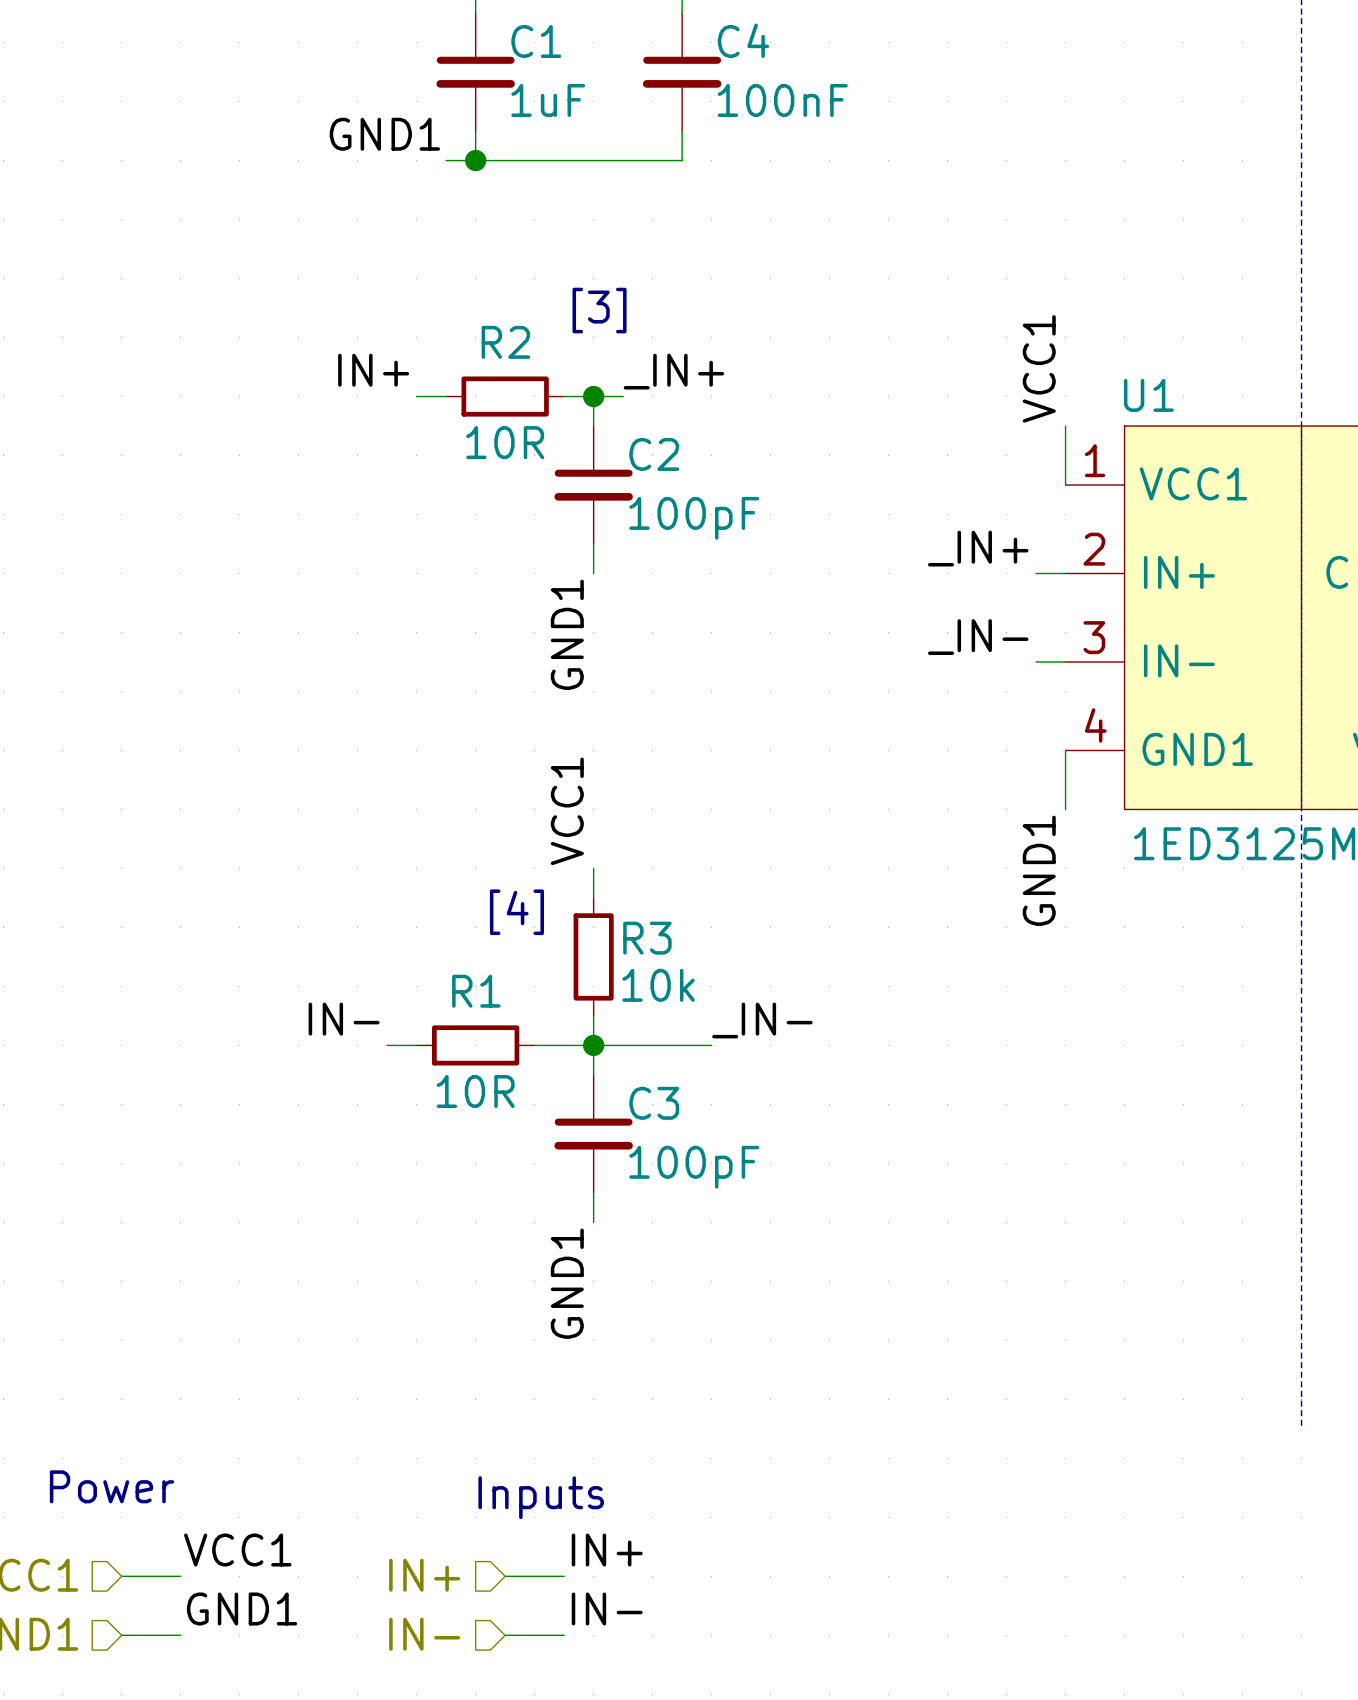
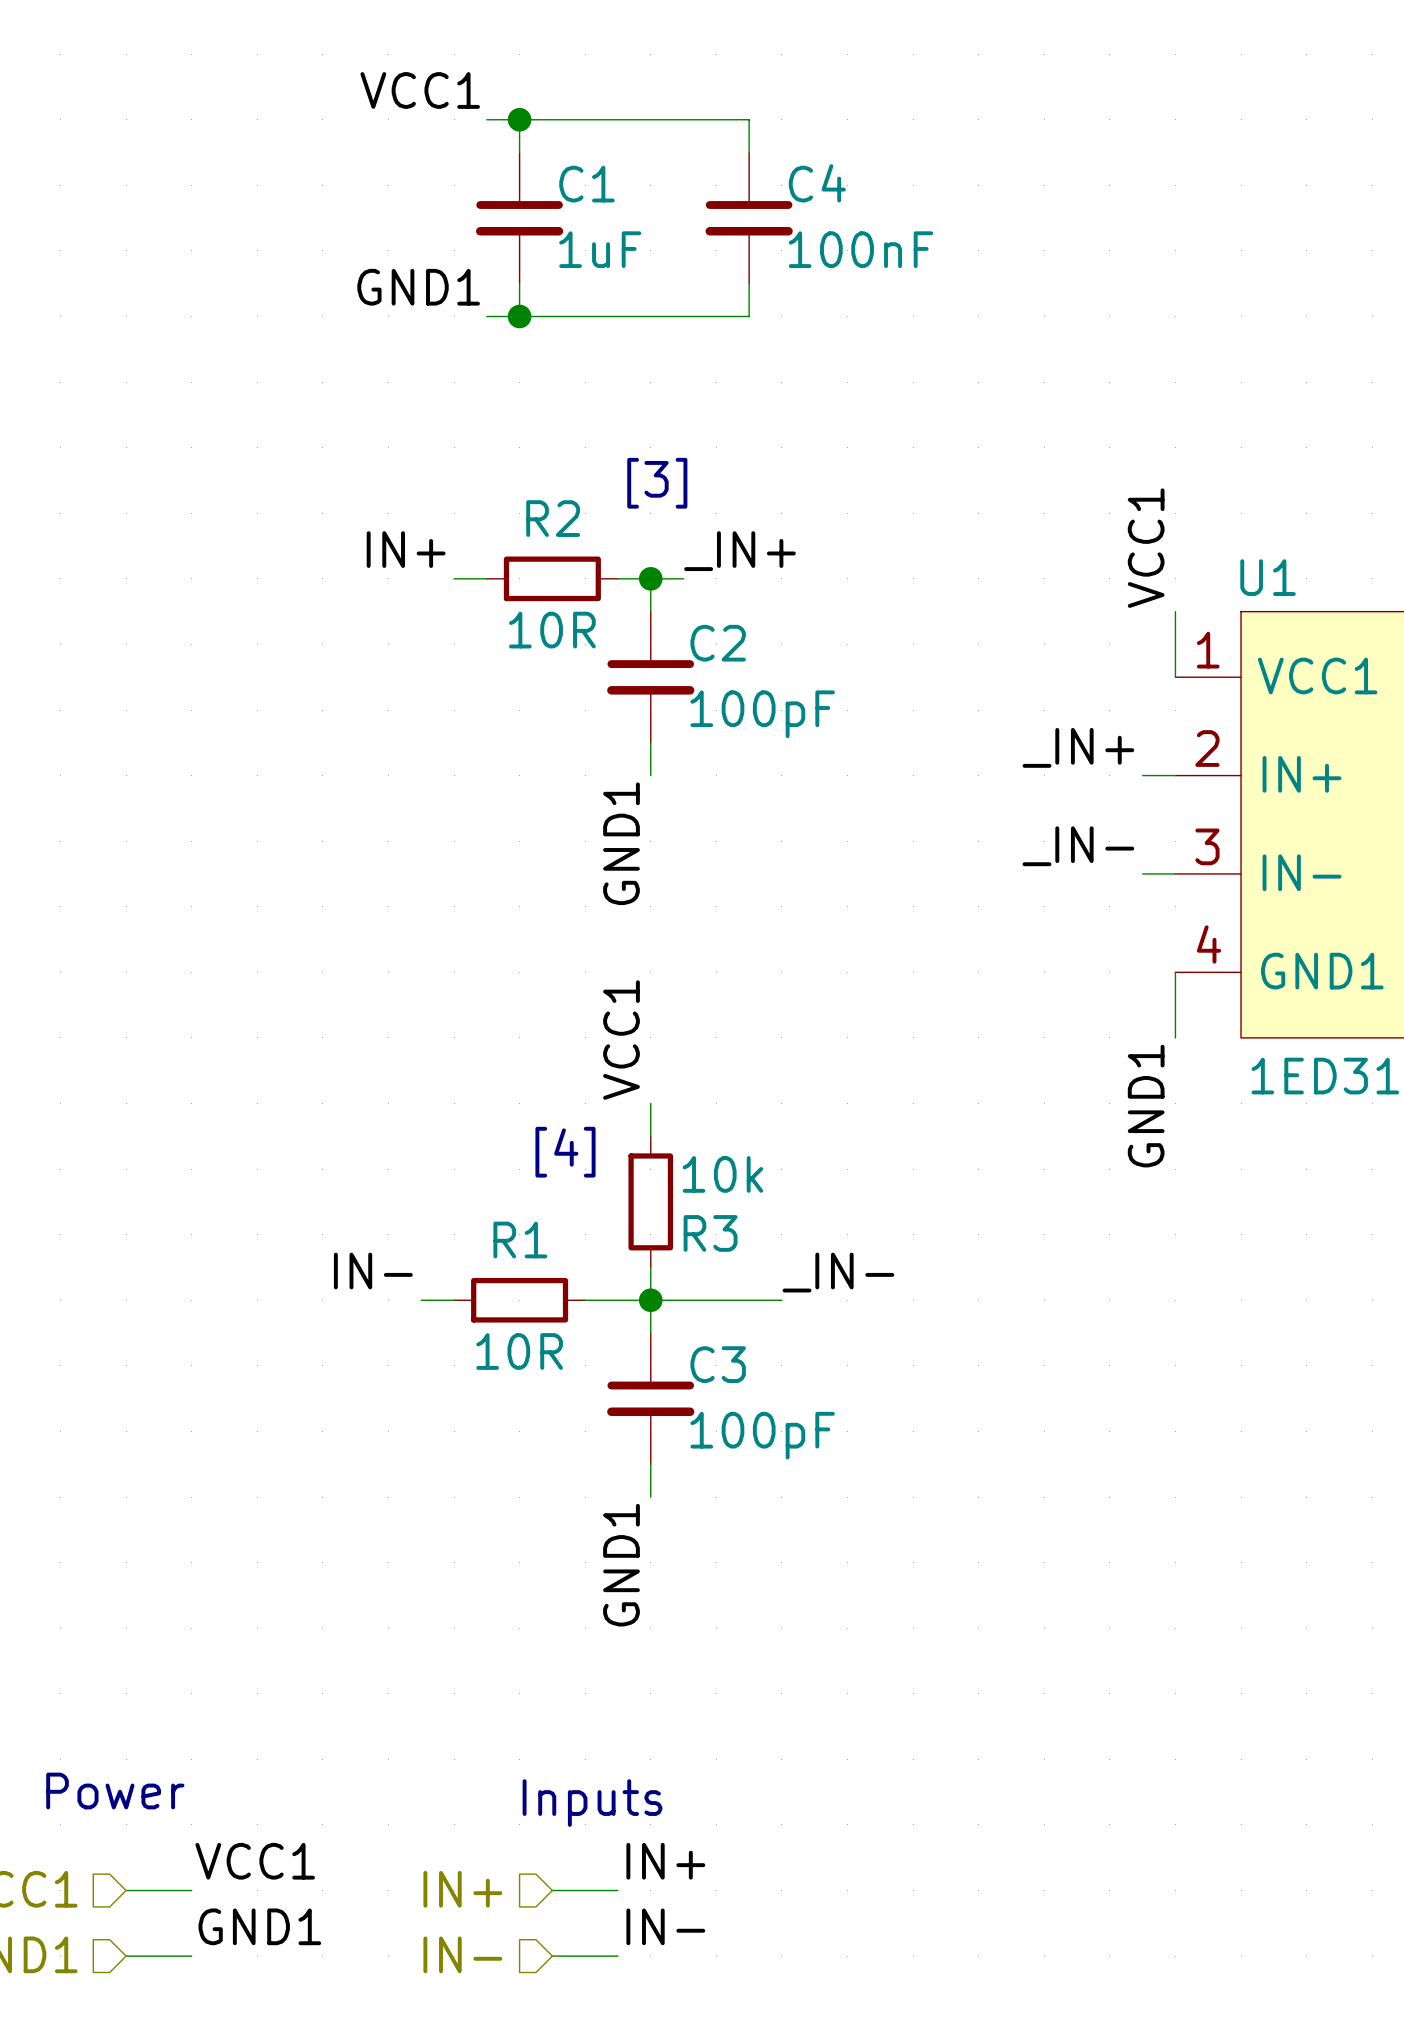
R3 name position: R3 (647, 938) -> R3 (710, 1233)
R3 value position: 10k (658, 985) -> 10k (722, 1174)

